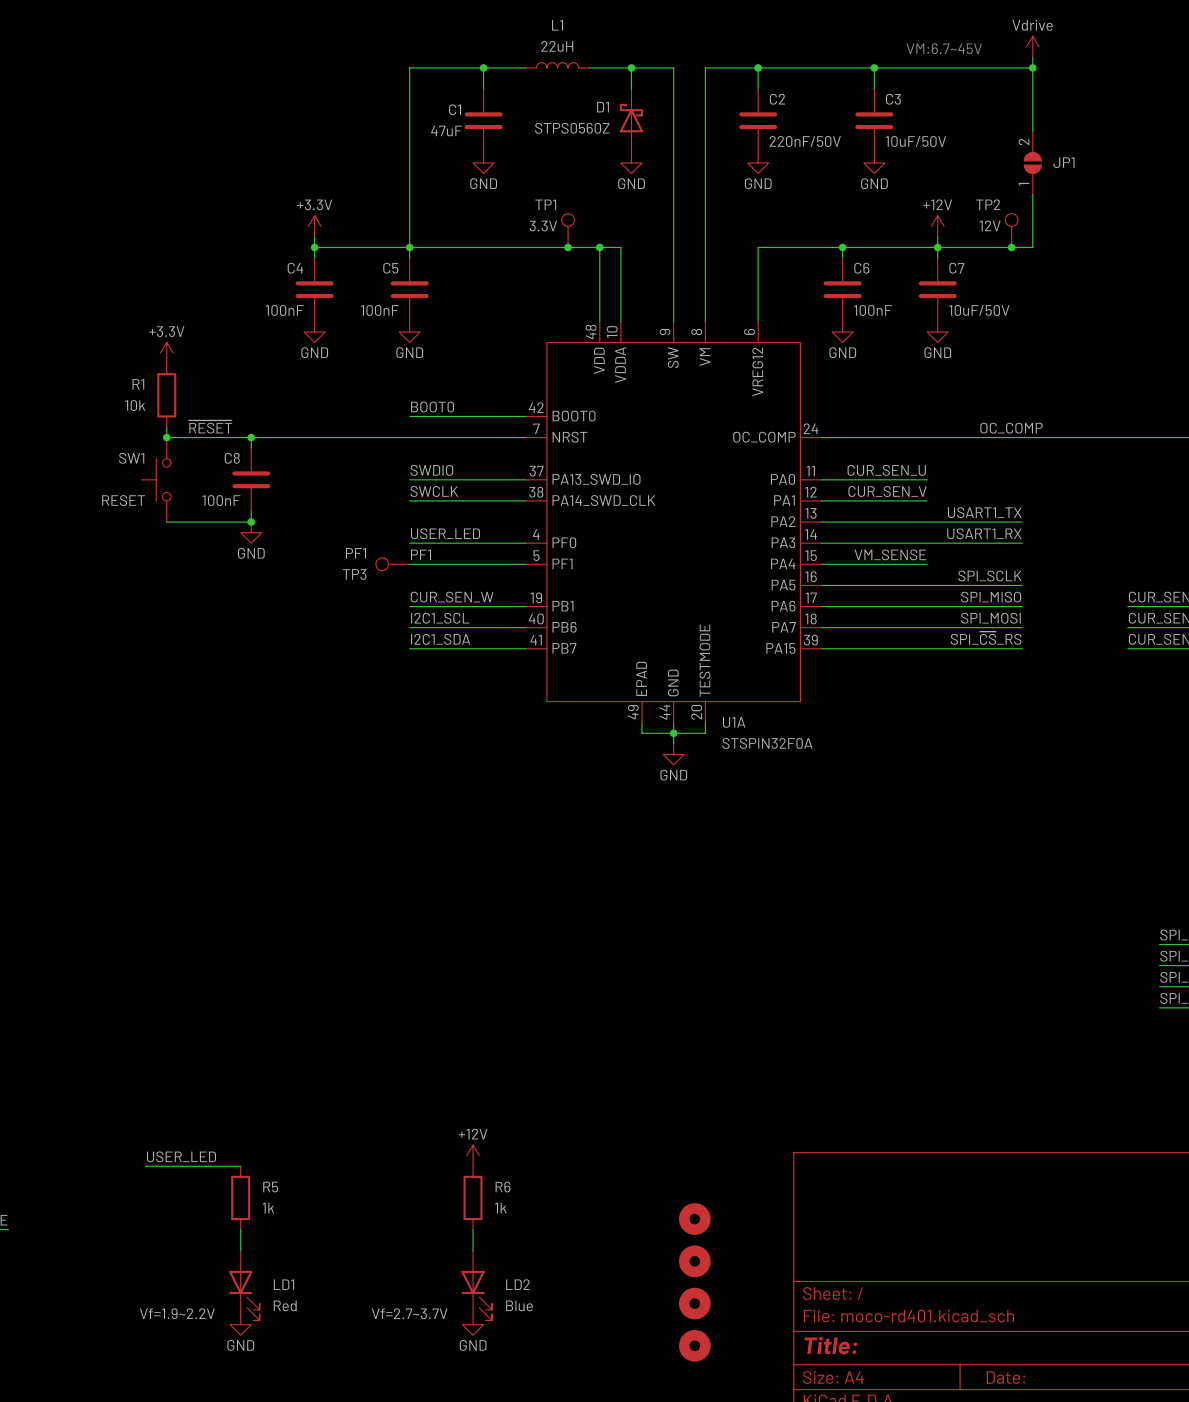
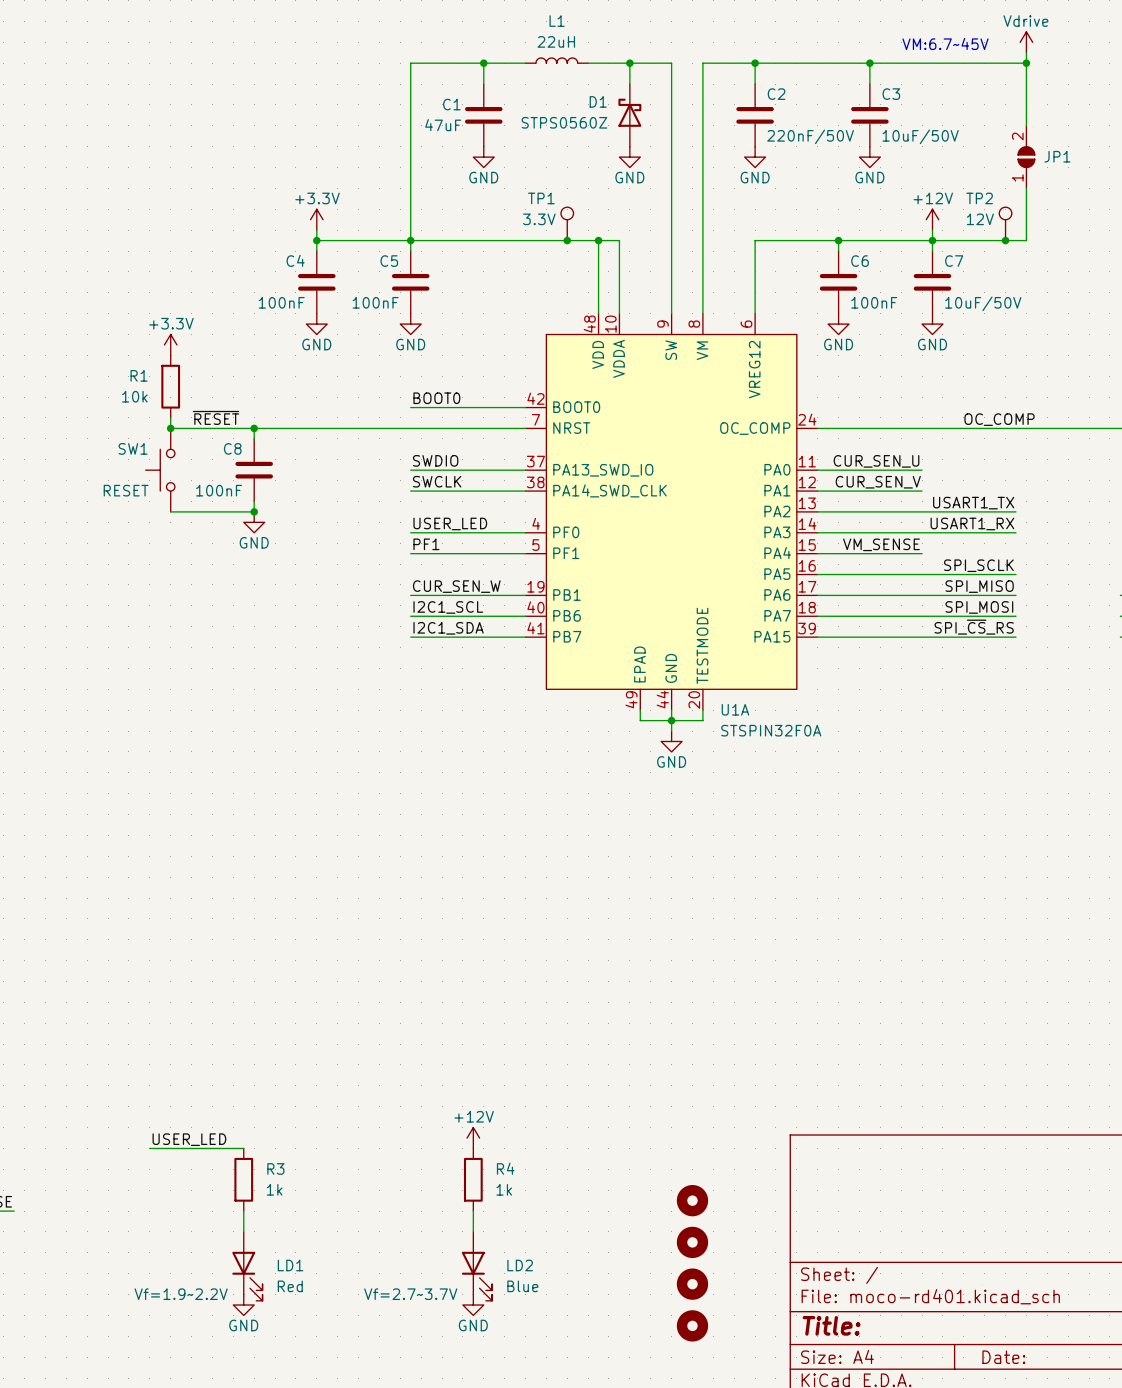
TP3: PF1 (392, 564) -> none
R5 name: R5 (270, 1187) -> R3 (275, 1168)
R6 name: R6 (503, 1187) -> R4 (505, 1168)

